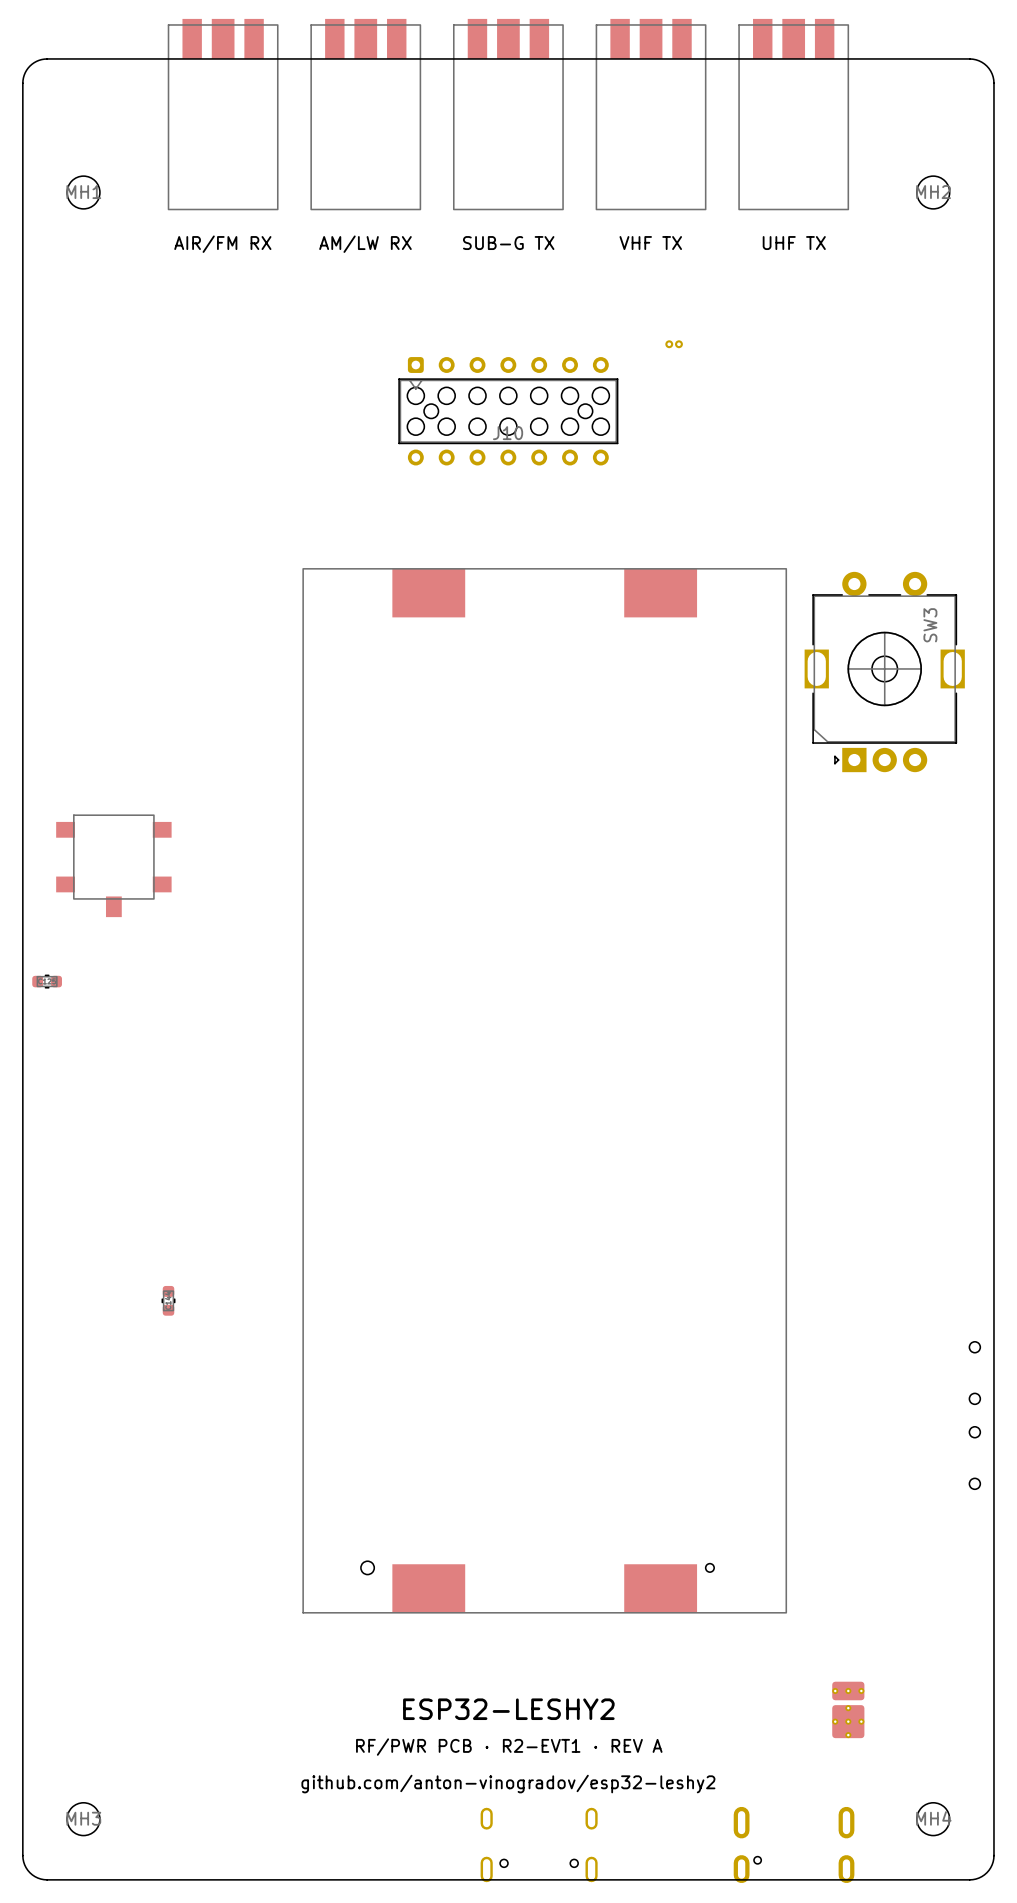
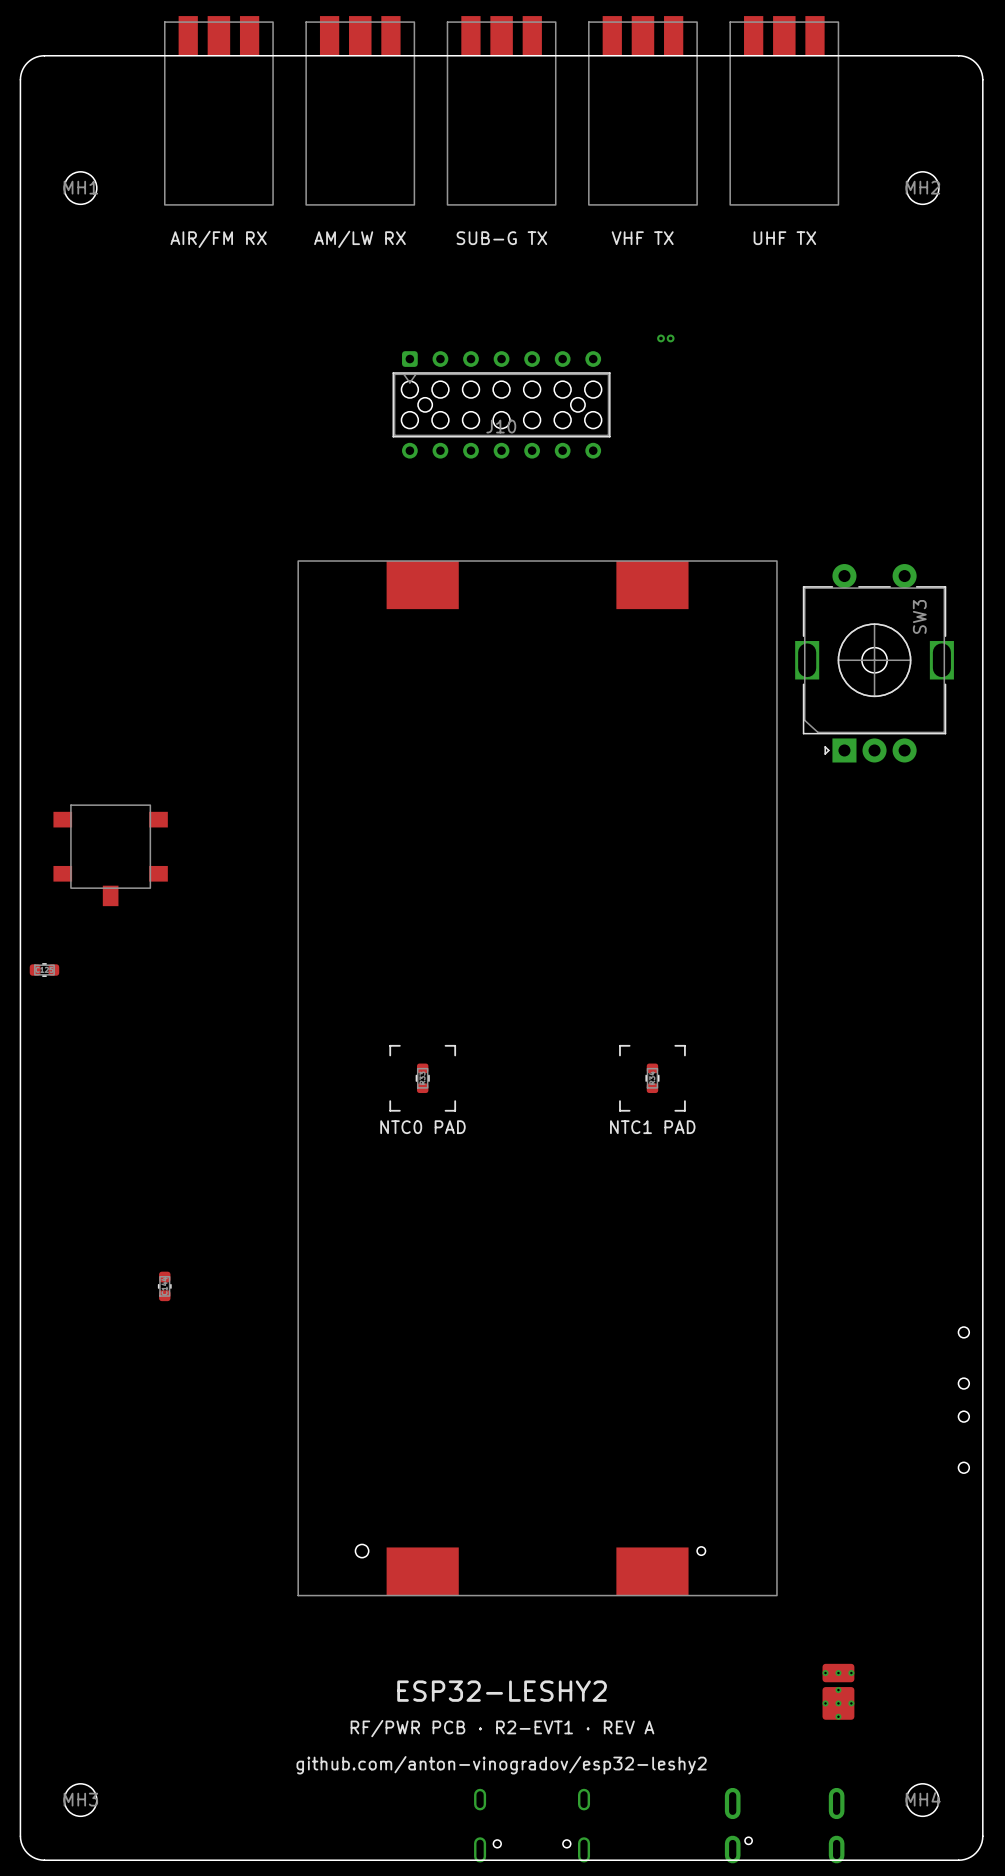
line: none -> (399, 1045) (390, 1045) (390, 1055)
line: none -> (445, 1045) (455, 1045) (455, 1055)
line: none -> (629, 1045) (619, 1045) (619, 1055)
line: none -> (675, 1045) (684, 1045) (684, 1055)
part: none -> (422, 1078)
part: none -> (652, 1078)
line: none -> (390, 1101) (390, 1110) (399, 1110)
line: none -> (455, 1101) (455, 1110) (445, 1110)
line: none -> (619, 1101) (619, 1110) (629, 1110)
line: none -> (684, 1101) (684, 1110) (675, 1110)
text: none -> NTC0 PAD (422, 1127)
text: none -> NTC1 PAD (652, 1127)

